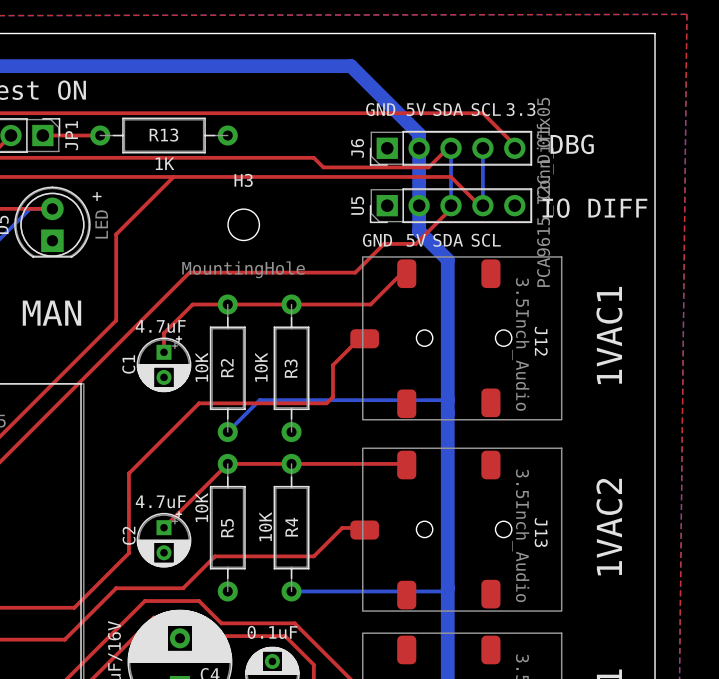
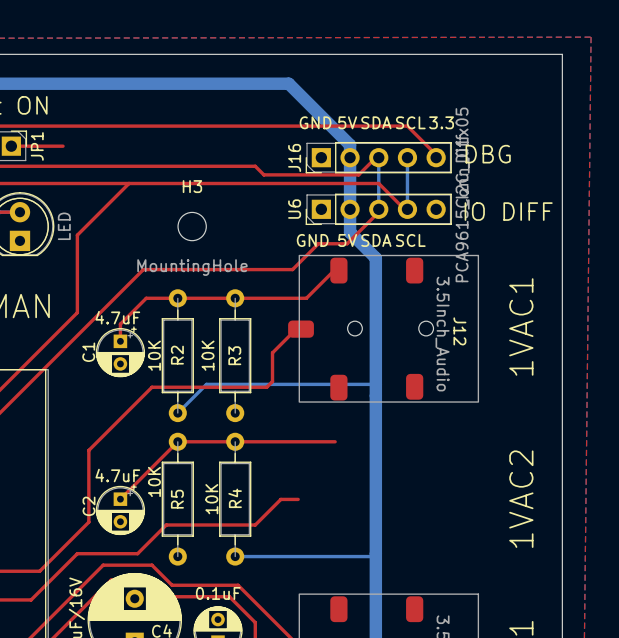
R13: 1K (164, 135) -> none
J6 name: J6 (357, 148) -> J16 (294, 157)
text: + (97, 196) -> none
U5 name: U5 (357, 205) -> U6 (294, 209)
J13: 3.5Inch_Audio (456, 529) -> none

